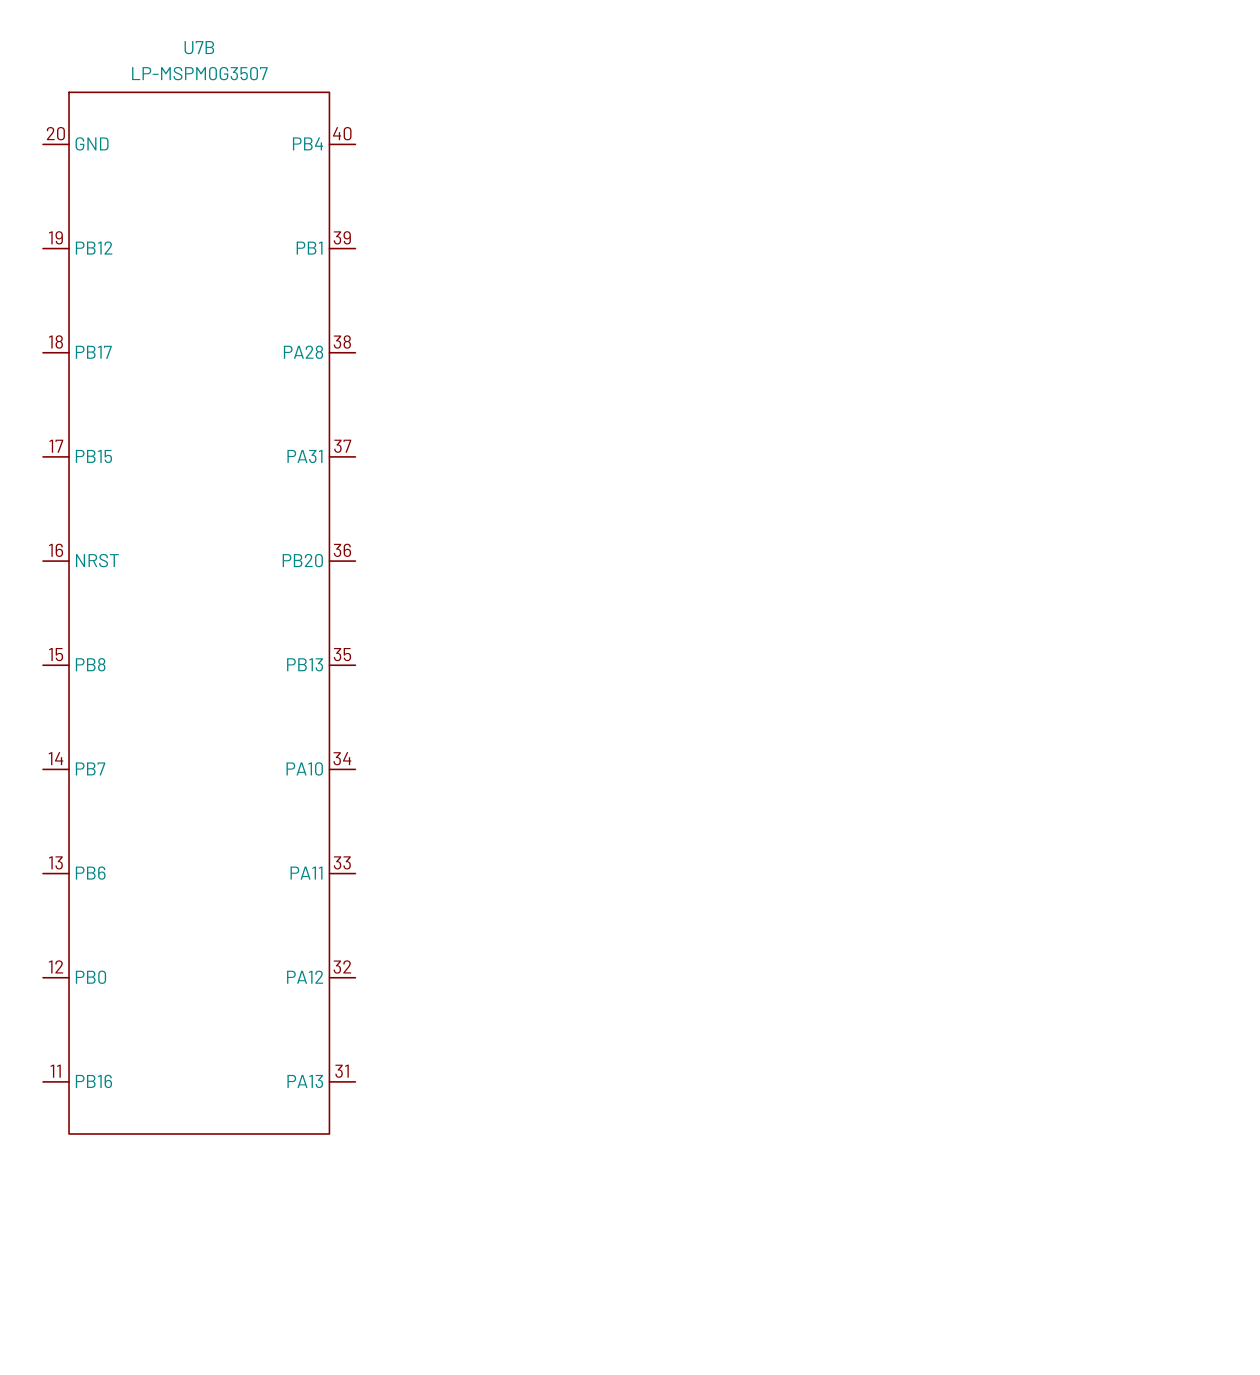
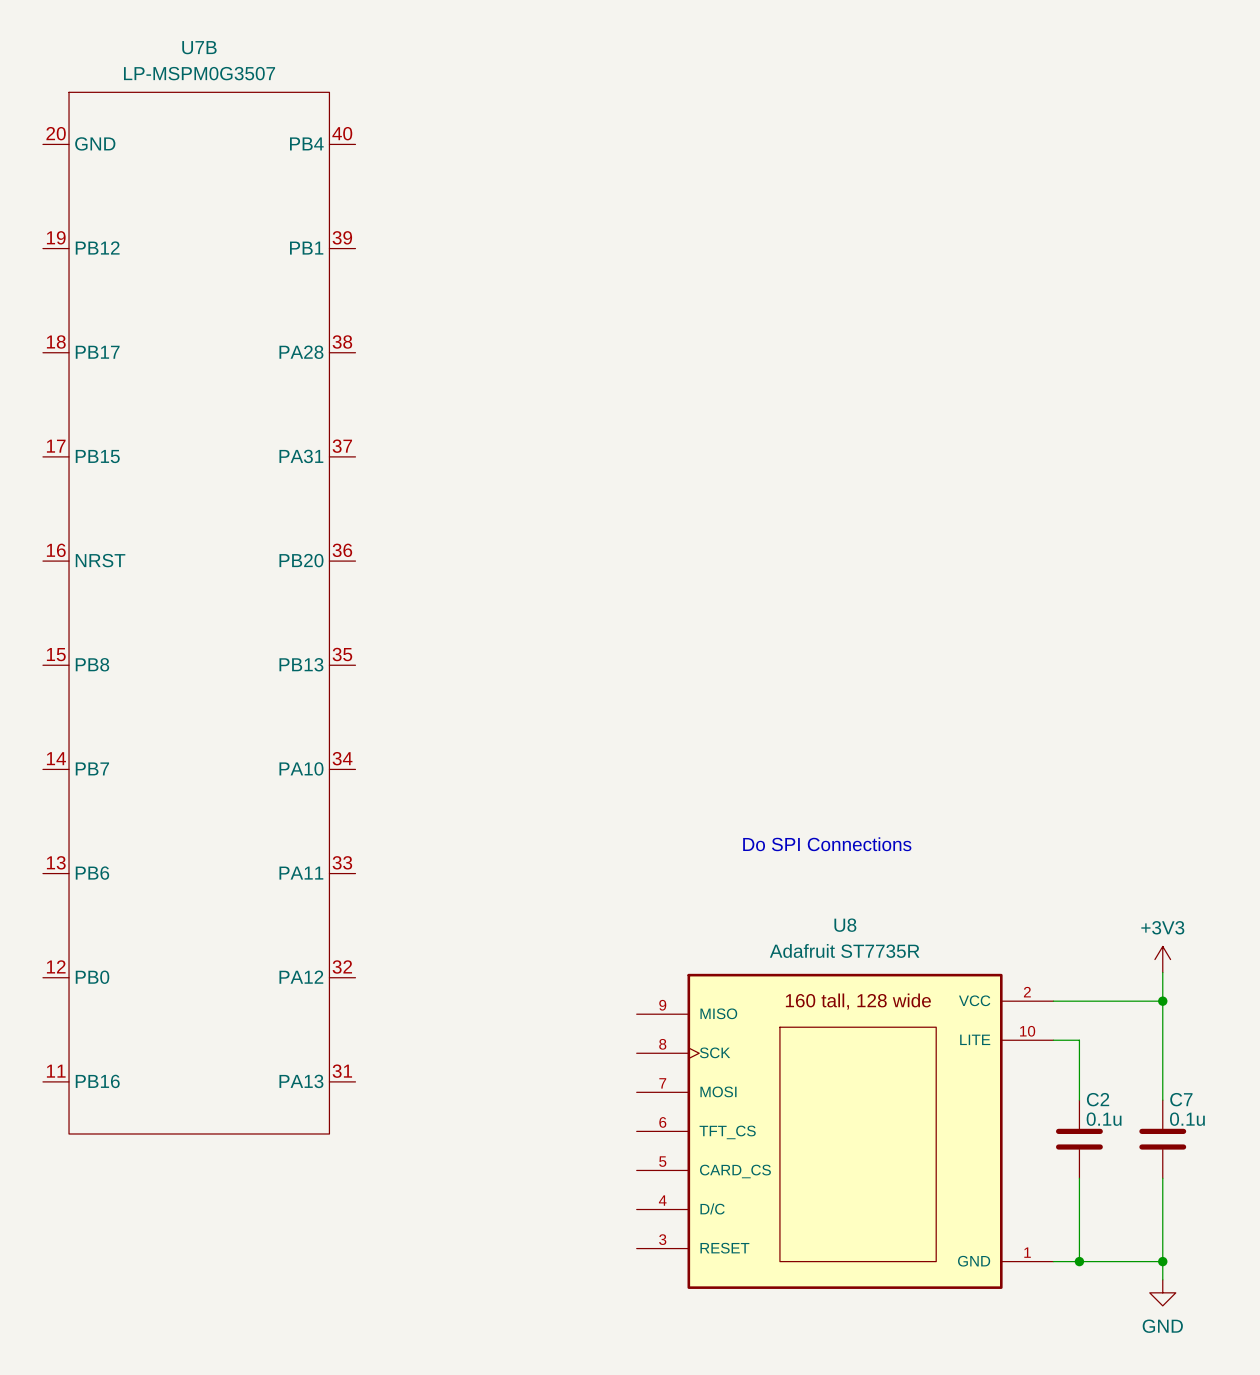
text: none -> Do SPI Connections (827, 844)
power symbol: none -> +3V3 (1162, 959)
wire: none -> (1162, 972) (1162, 1100)
wire: none -> (1053, 1001) (1162, 1001)
junction: none -> (1162, 1001)
wire: none -> (1053, 1040) (1079, 1040) (1079, 1100)
U8: none -> Adafruit ST7735R (845, 1131)
C2: none -> 0.1u (1079, 1139)
C7: none -> 0.1u (1162, 1139)
wire: none -> (1079, 1178) (1079, 1261)
wire: none -> (1162, 1178) (1162, 1279)
wire: none -> (1053, 1261) (1162, 1261)
junction: none -> (1079, 1261)
junction: none -> (1162, 1261)
power symbol: none -> GND (1162, 1292)

